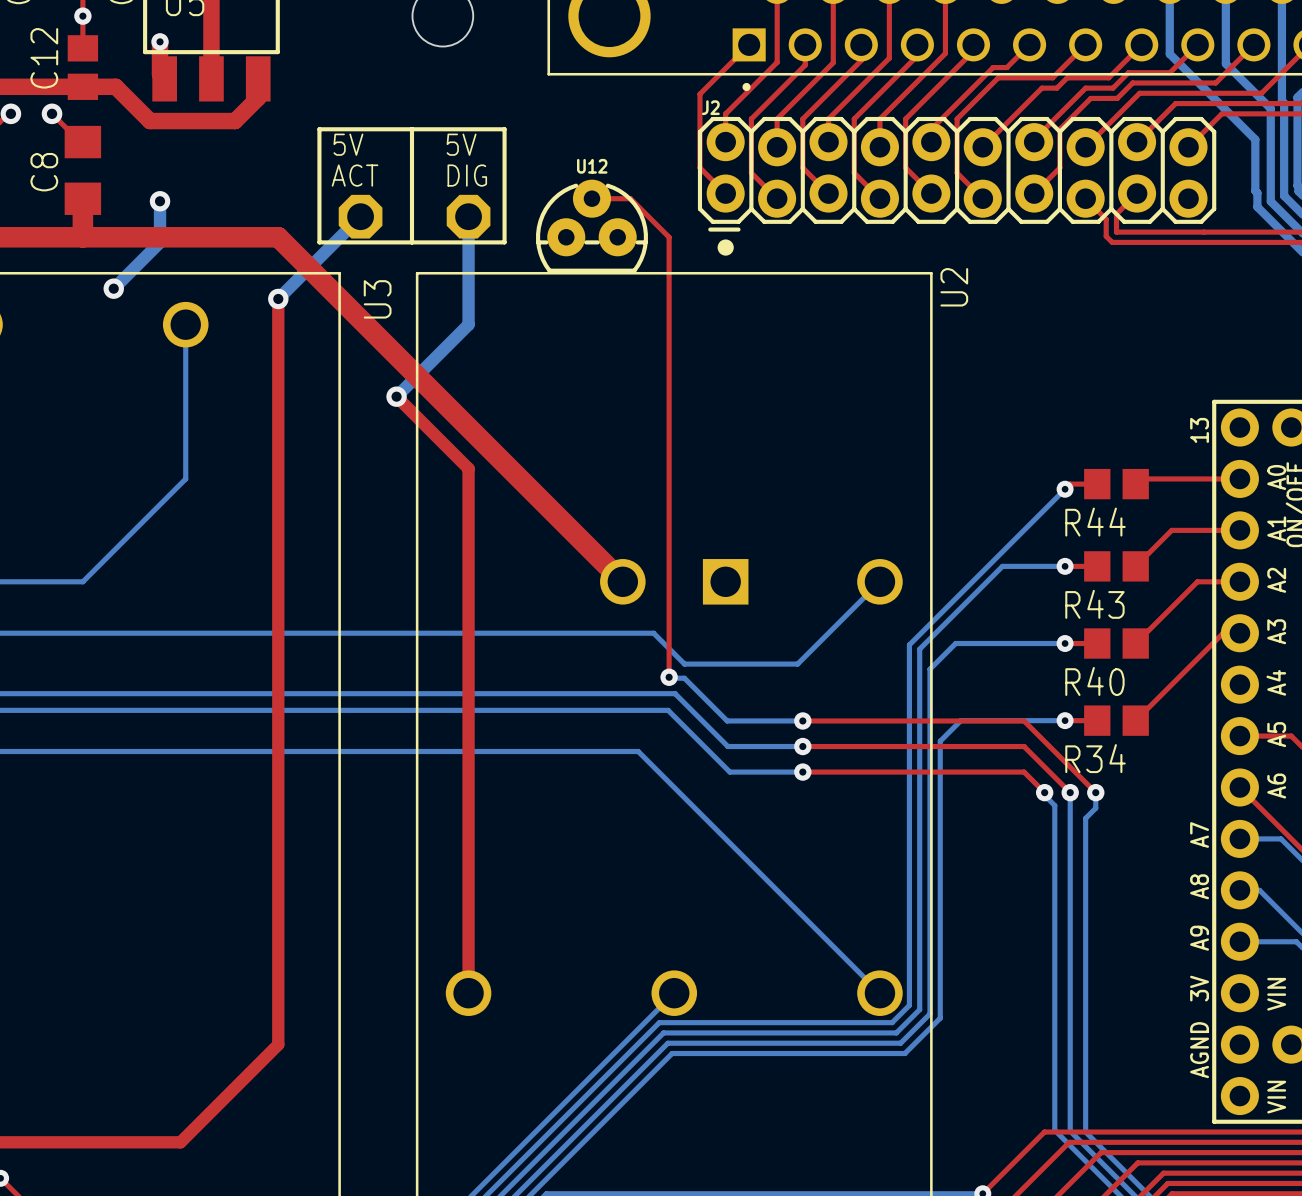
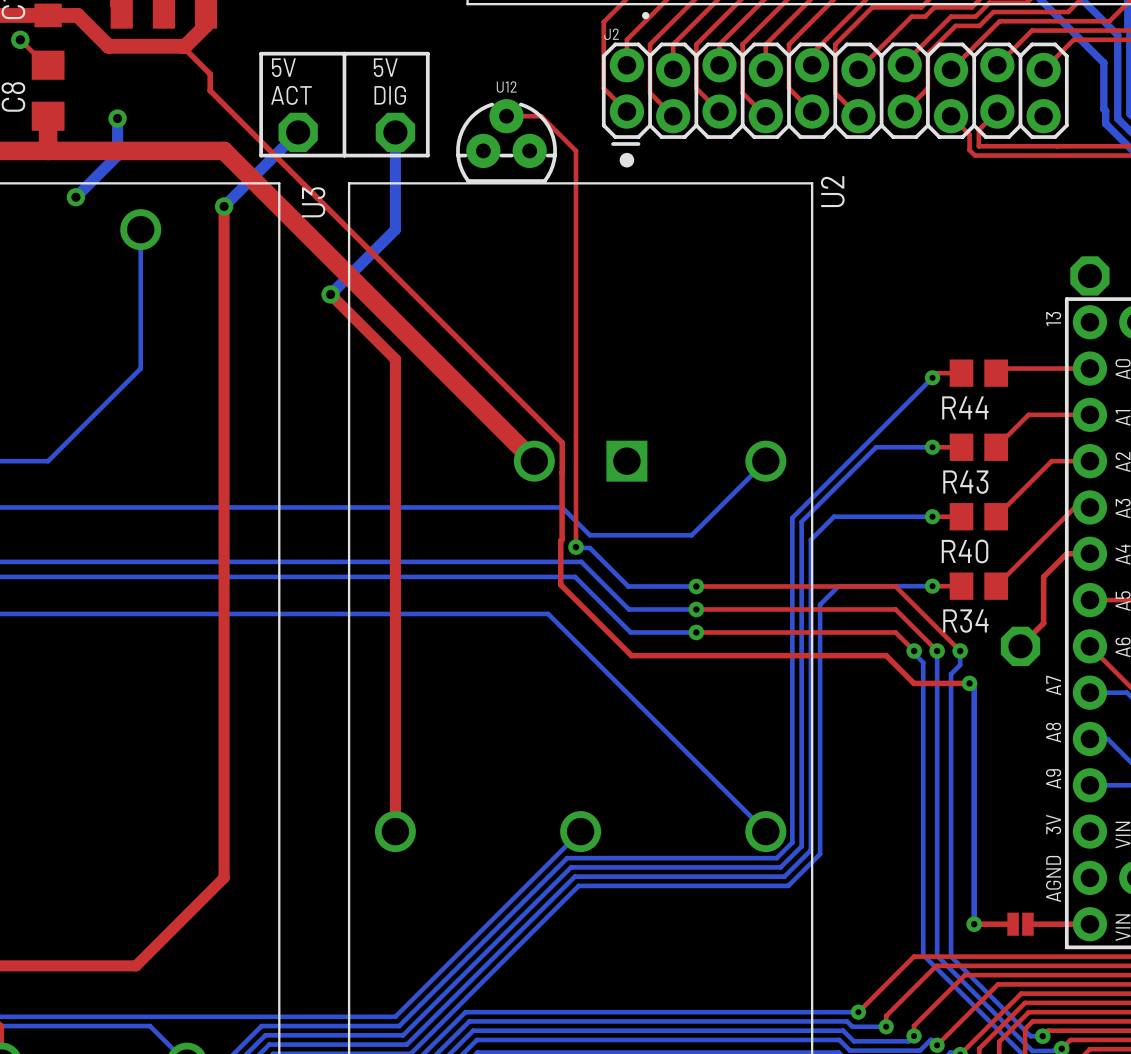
top track: none -> (182, 46) (210, 74) (210, 90) (562, 442) (562, 472)
part: none -> (1089, 275)
top track: none -> (562, 472) (560, 584) (631, 655) (886, 655) (914, 683) (969, 683)
top track: none -> (1089, 553) (1066, 553) (1043, 576) (1043, 623) (1020, 646)
part: none -> (1020, 646)
bottom track: none -> (969, 683) (974, 688) (974, 924)
via: none -> (969, 683)
top track: none -> (974, 924) (1013, 924)
via: none -> (974, 924)
part: none -> (1020, 924)
top track: none -> (1027, 924) (1089, 924)

